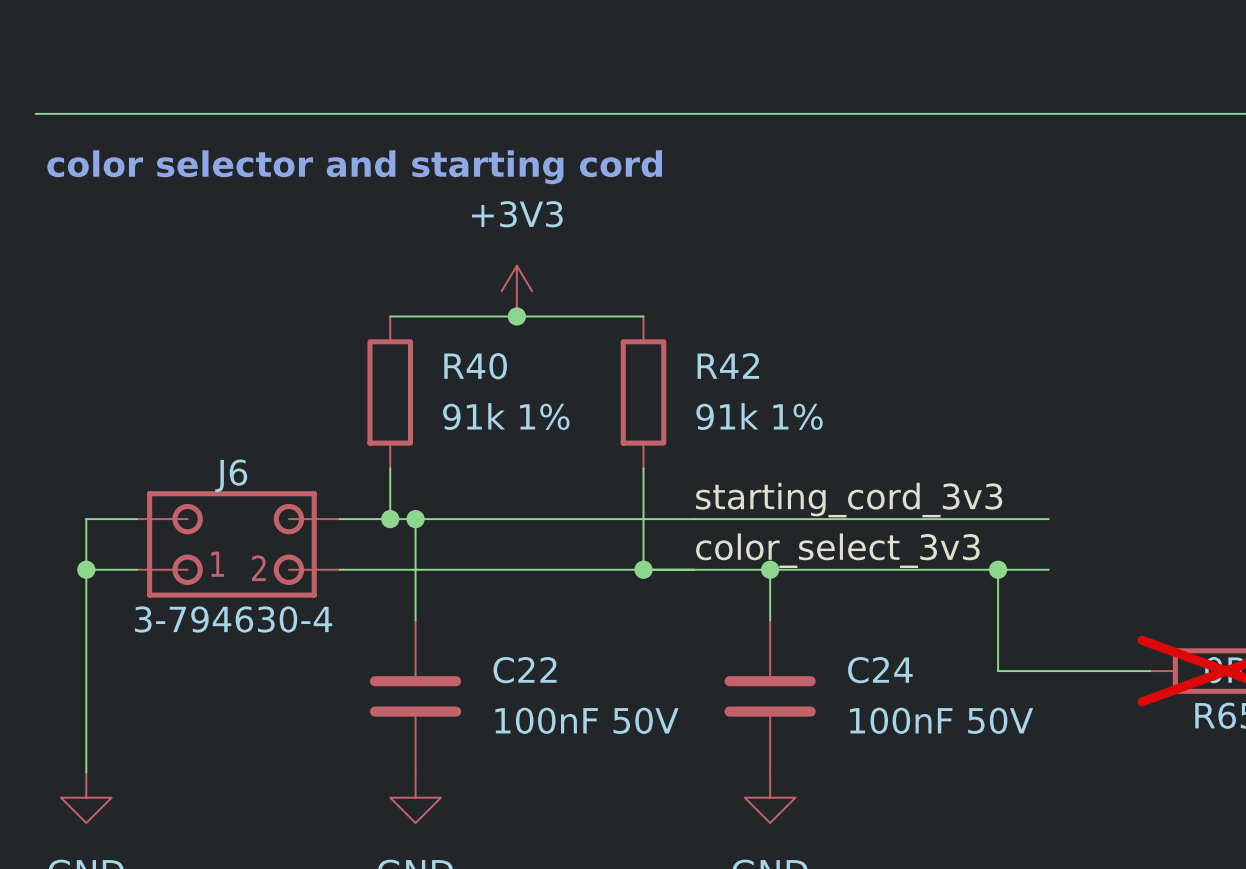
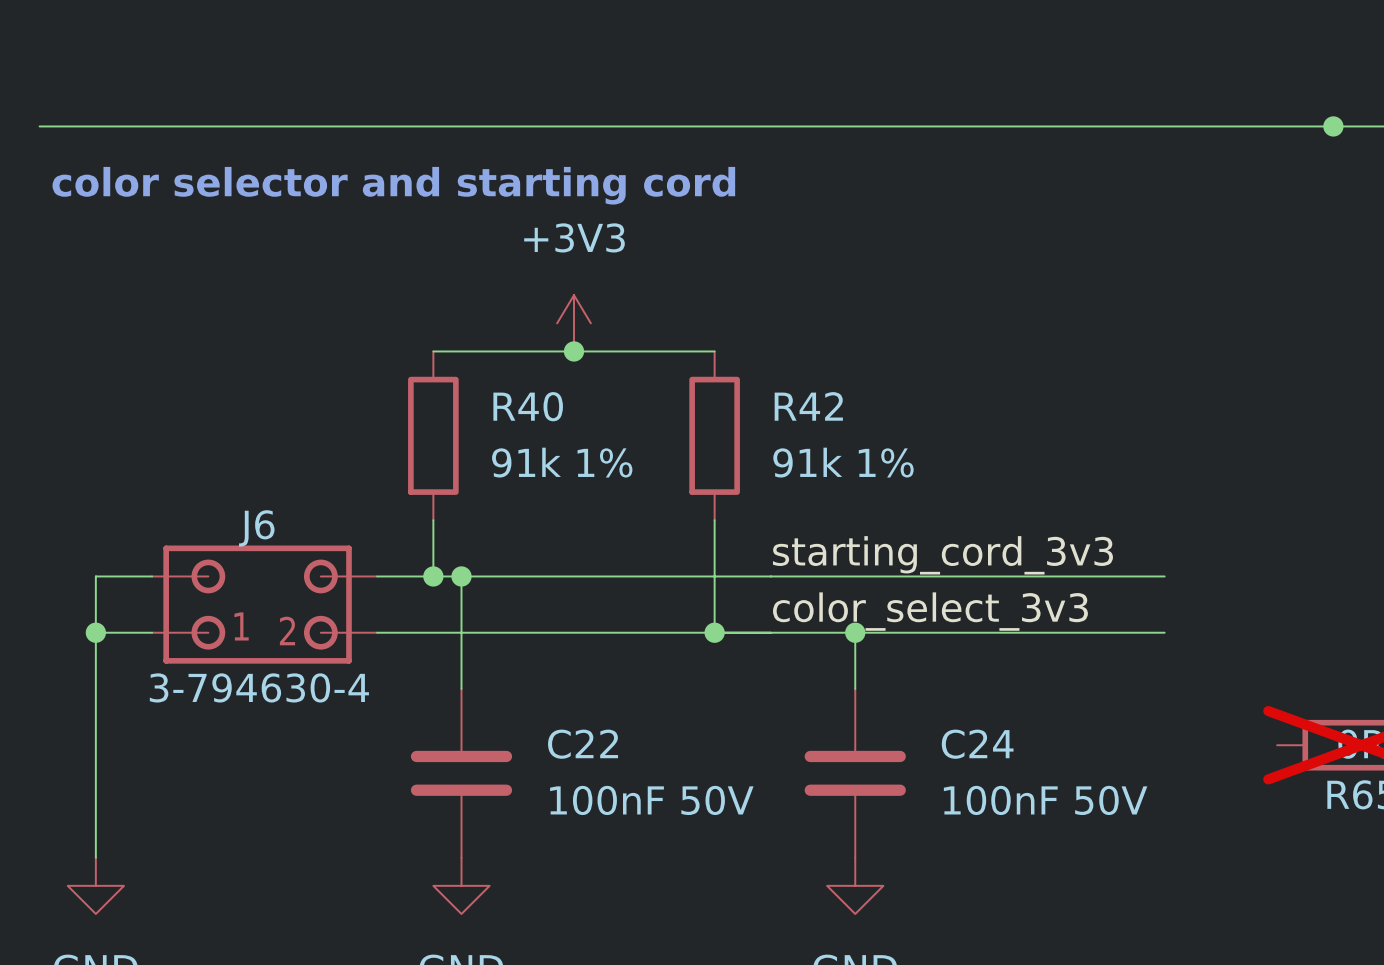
junction: none -> (1333, 126)
wire: (998, 569) (998, 671) (1150, 671) -> none
junction: (998, 569) -> none

